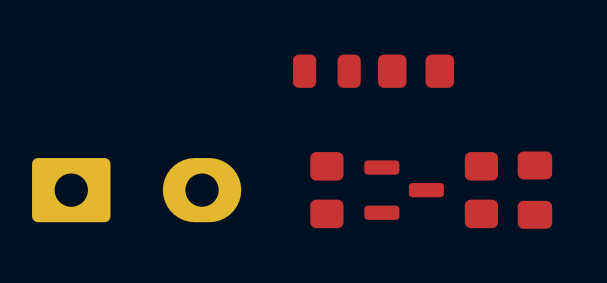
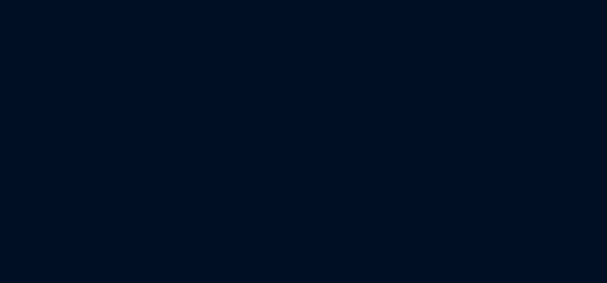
part: (326, 71) -> none
part: (416, 71) -> none
part: (136, 190) -> none
part: (326, 190) -> none
part: (404, 190) -> none
part: (481, 190) -> none
part: (534, 190) -> none

